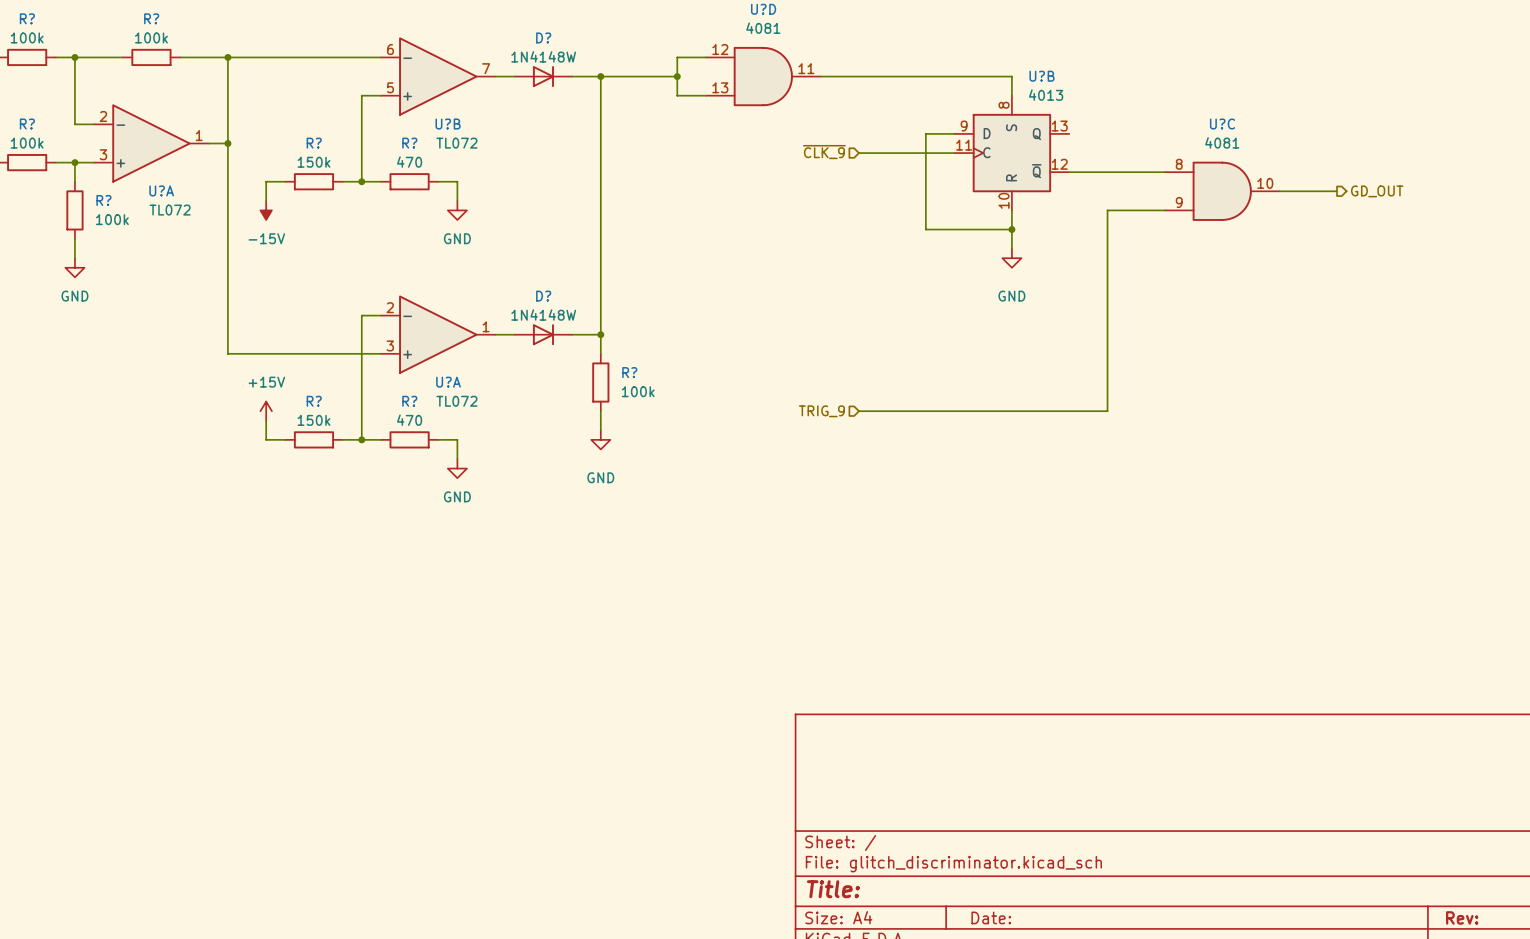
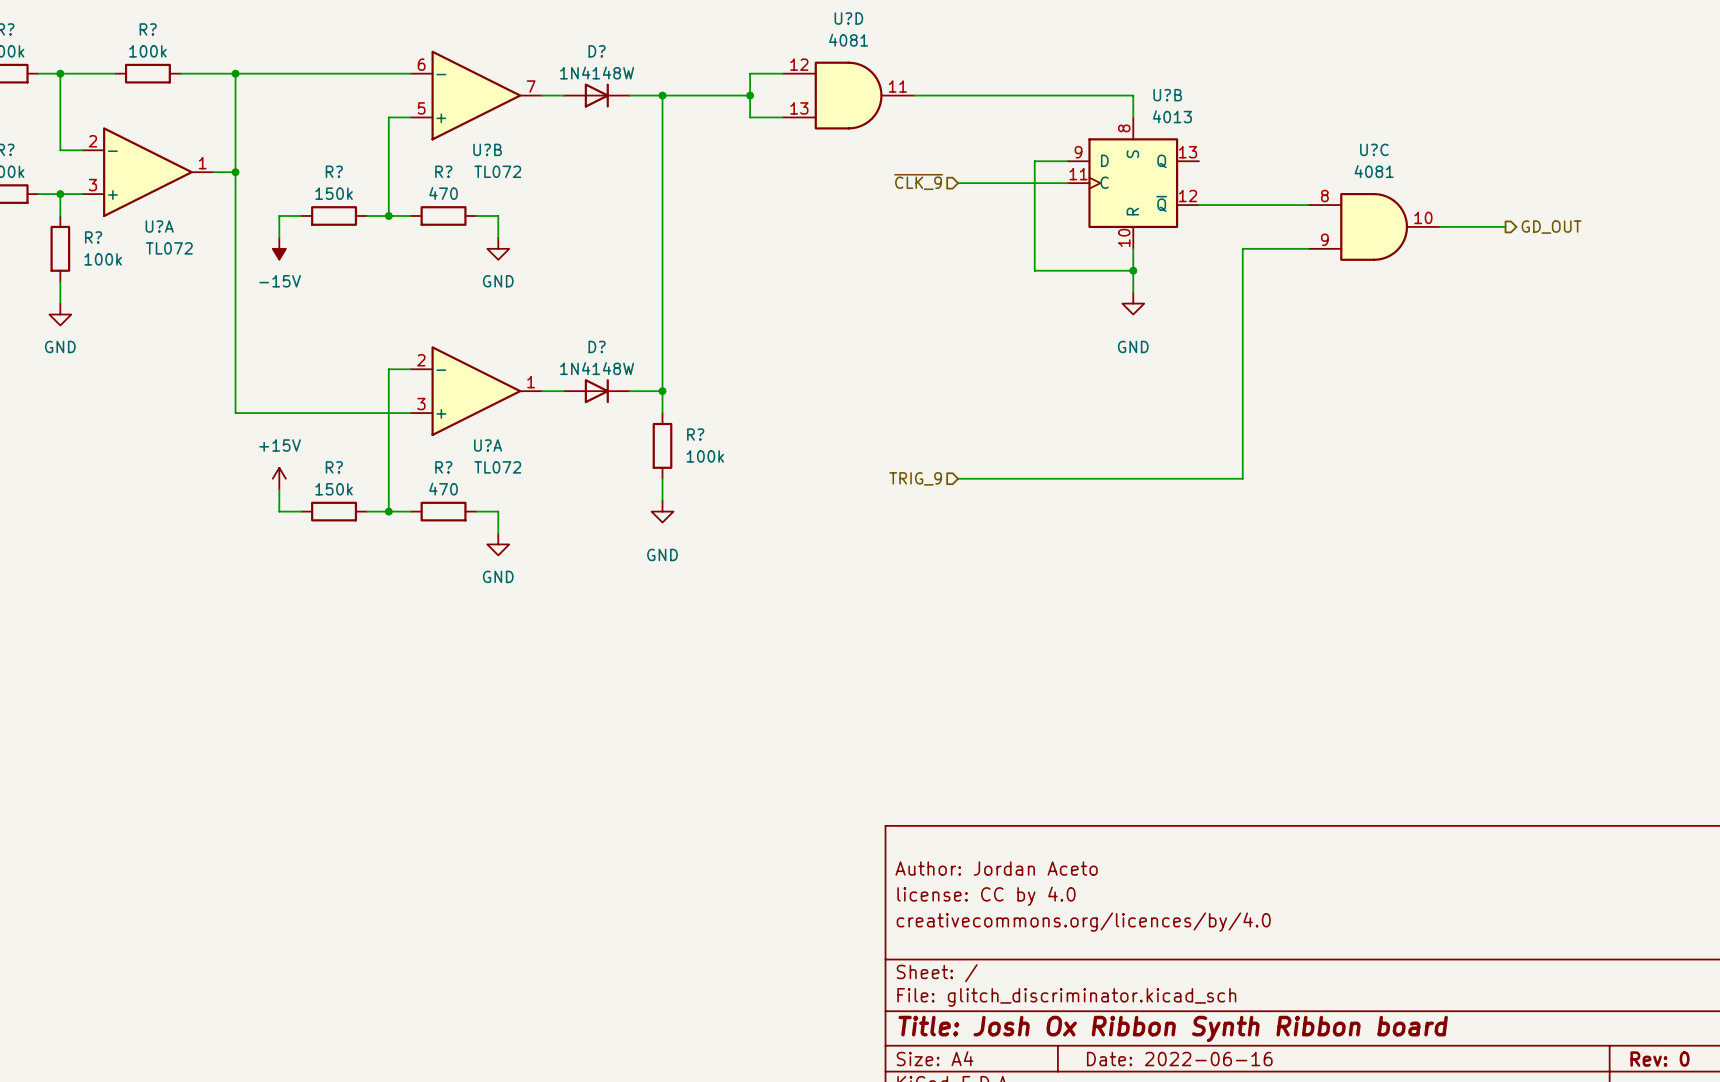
title block: none -> Author: Jordan Aceto (996, 868)
title block: none -> license: CC by 4.0 (986, 896)
title block: none -> creativecommons.org/licences/by/4.0 (1083, 922)
title block: Title: (833, 889) -> Title: Josh Ox Ribbon Synth Ribbon board (1173, 1028)
title block: Date: (991, 917) -> Date: 2022-06-16 (1179, 1059)
title block: Rev: (1462, 917) -> Rev: 0 (1660, 1059)

